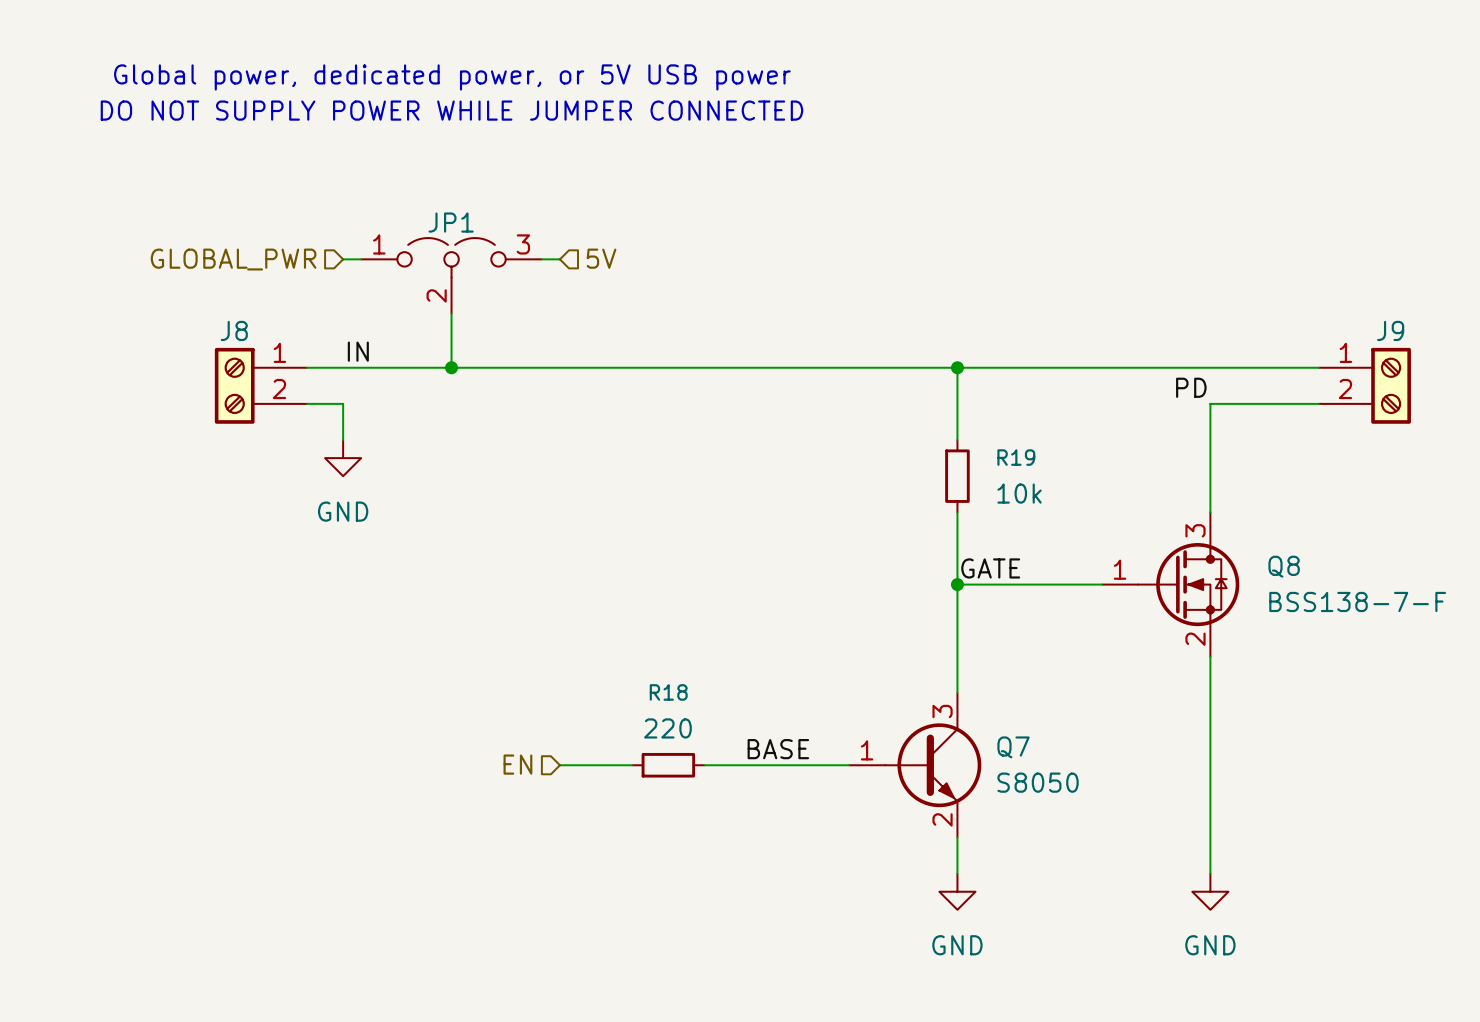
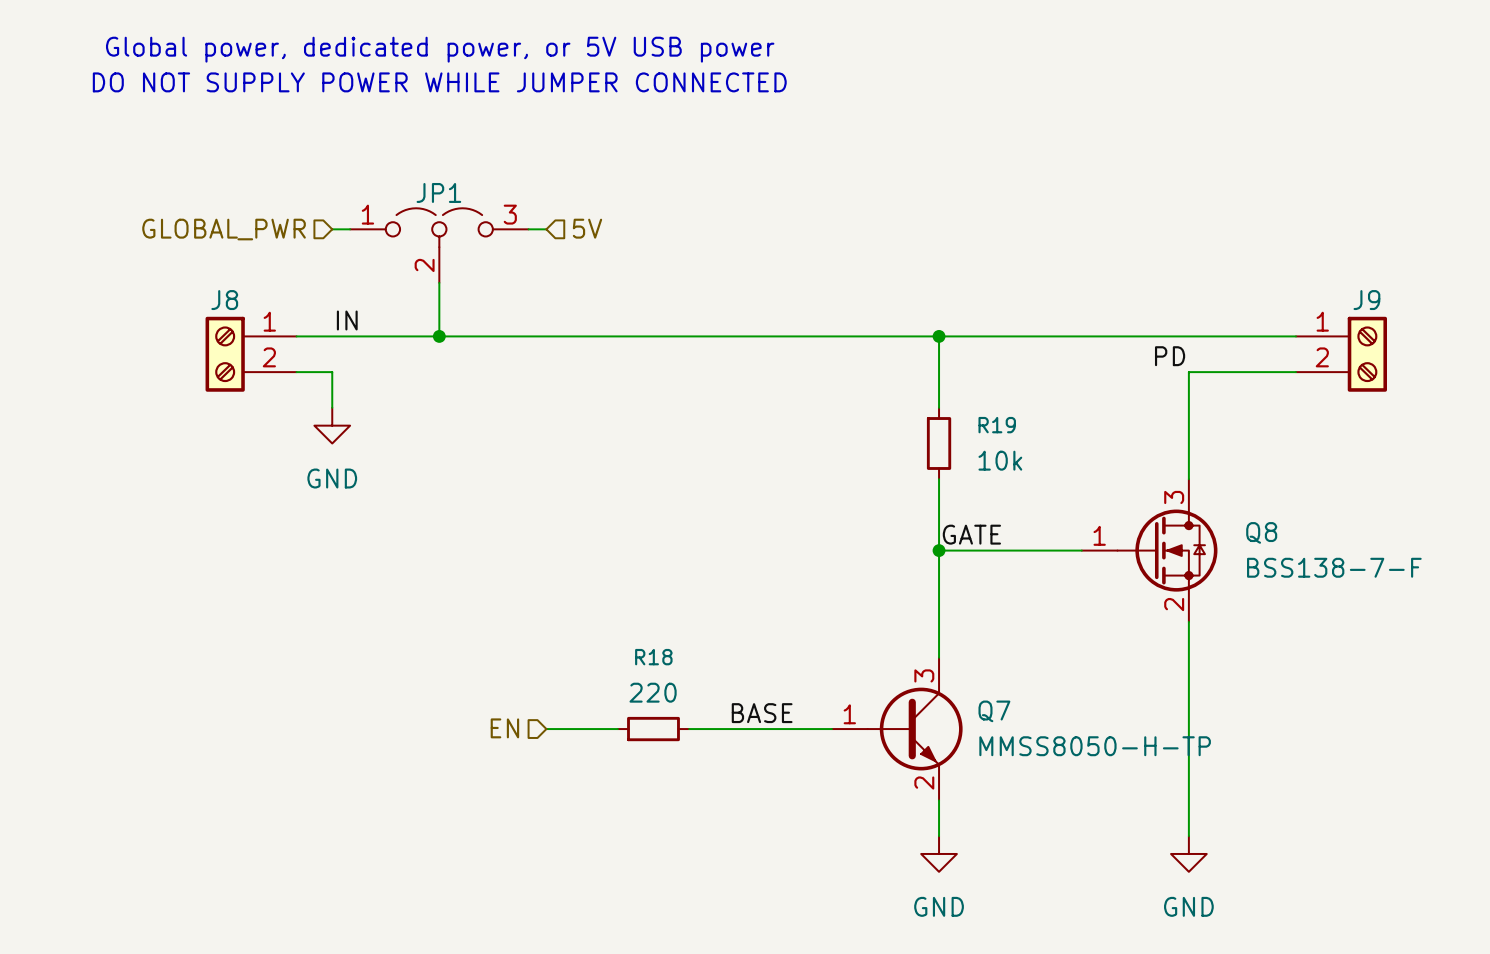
Q7 value: S8050 (1038, 782) -> MMSS8050-H-TP (1095, 746)

